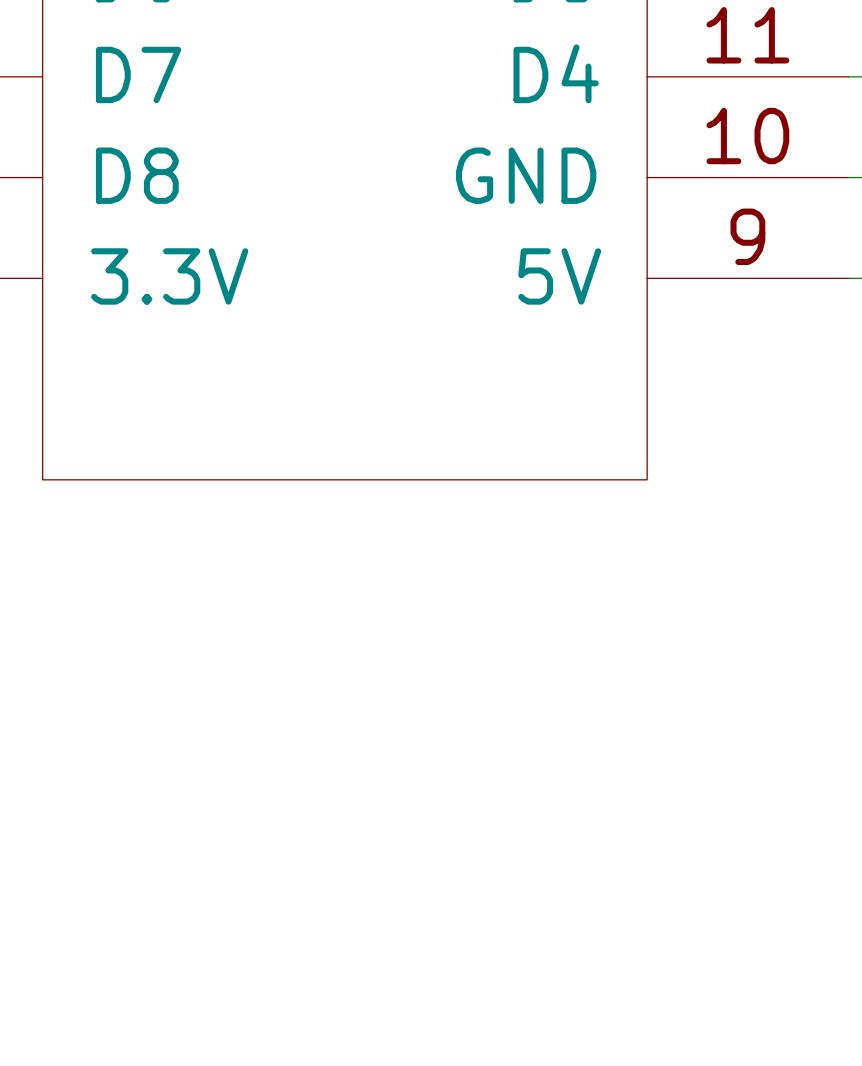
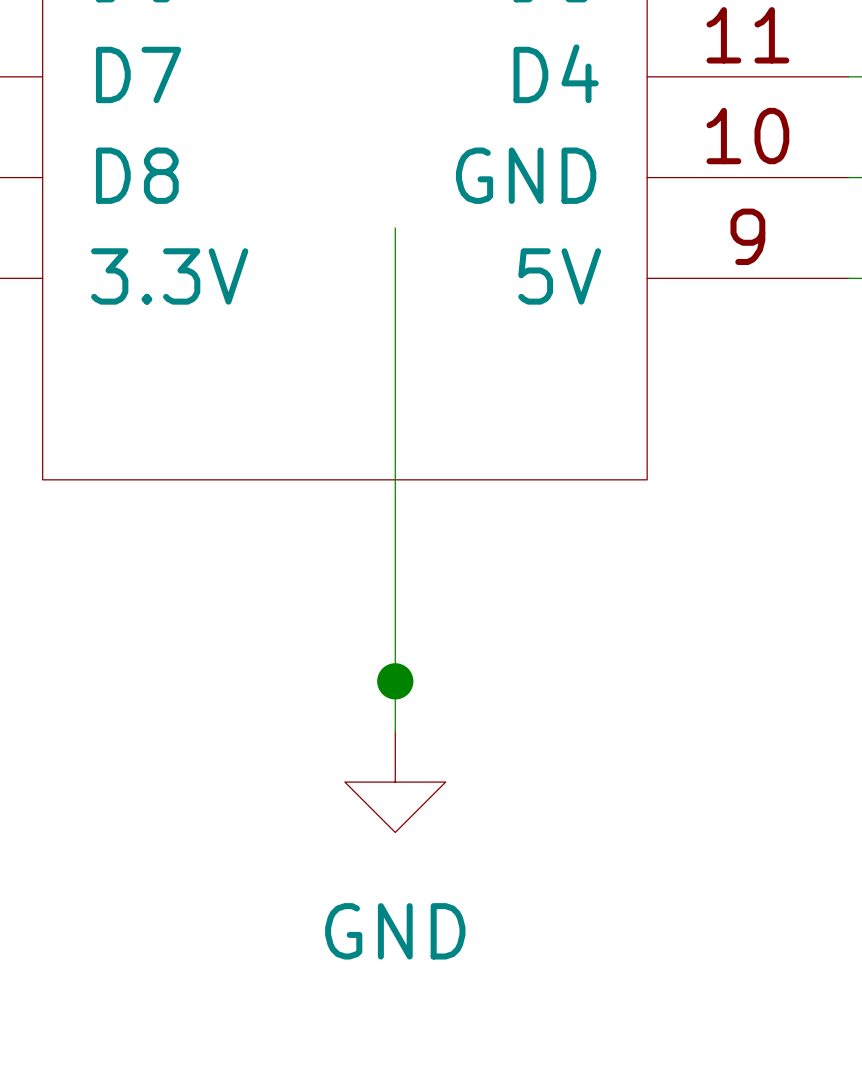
wire: none -> (395, 227) (395, 731)
junction: none -> (395, 681)
power symbol: none -> GND (395, 782)

